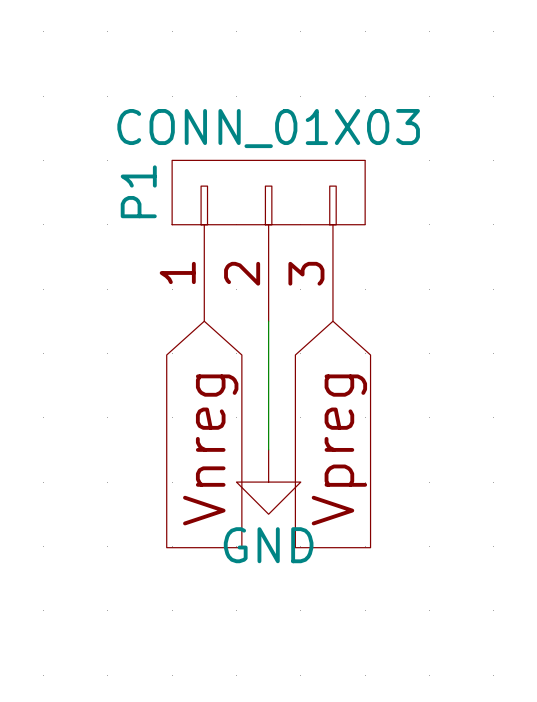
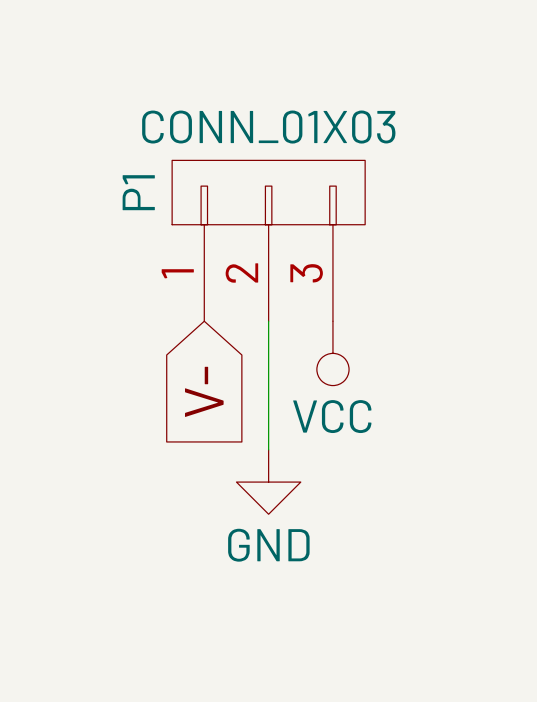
power symbol: none -> VCC (332, 353)
global label: Vnreg (210, 449) -> V- (204, 391)
global label: Vpreg (339, 449) -> none

